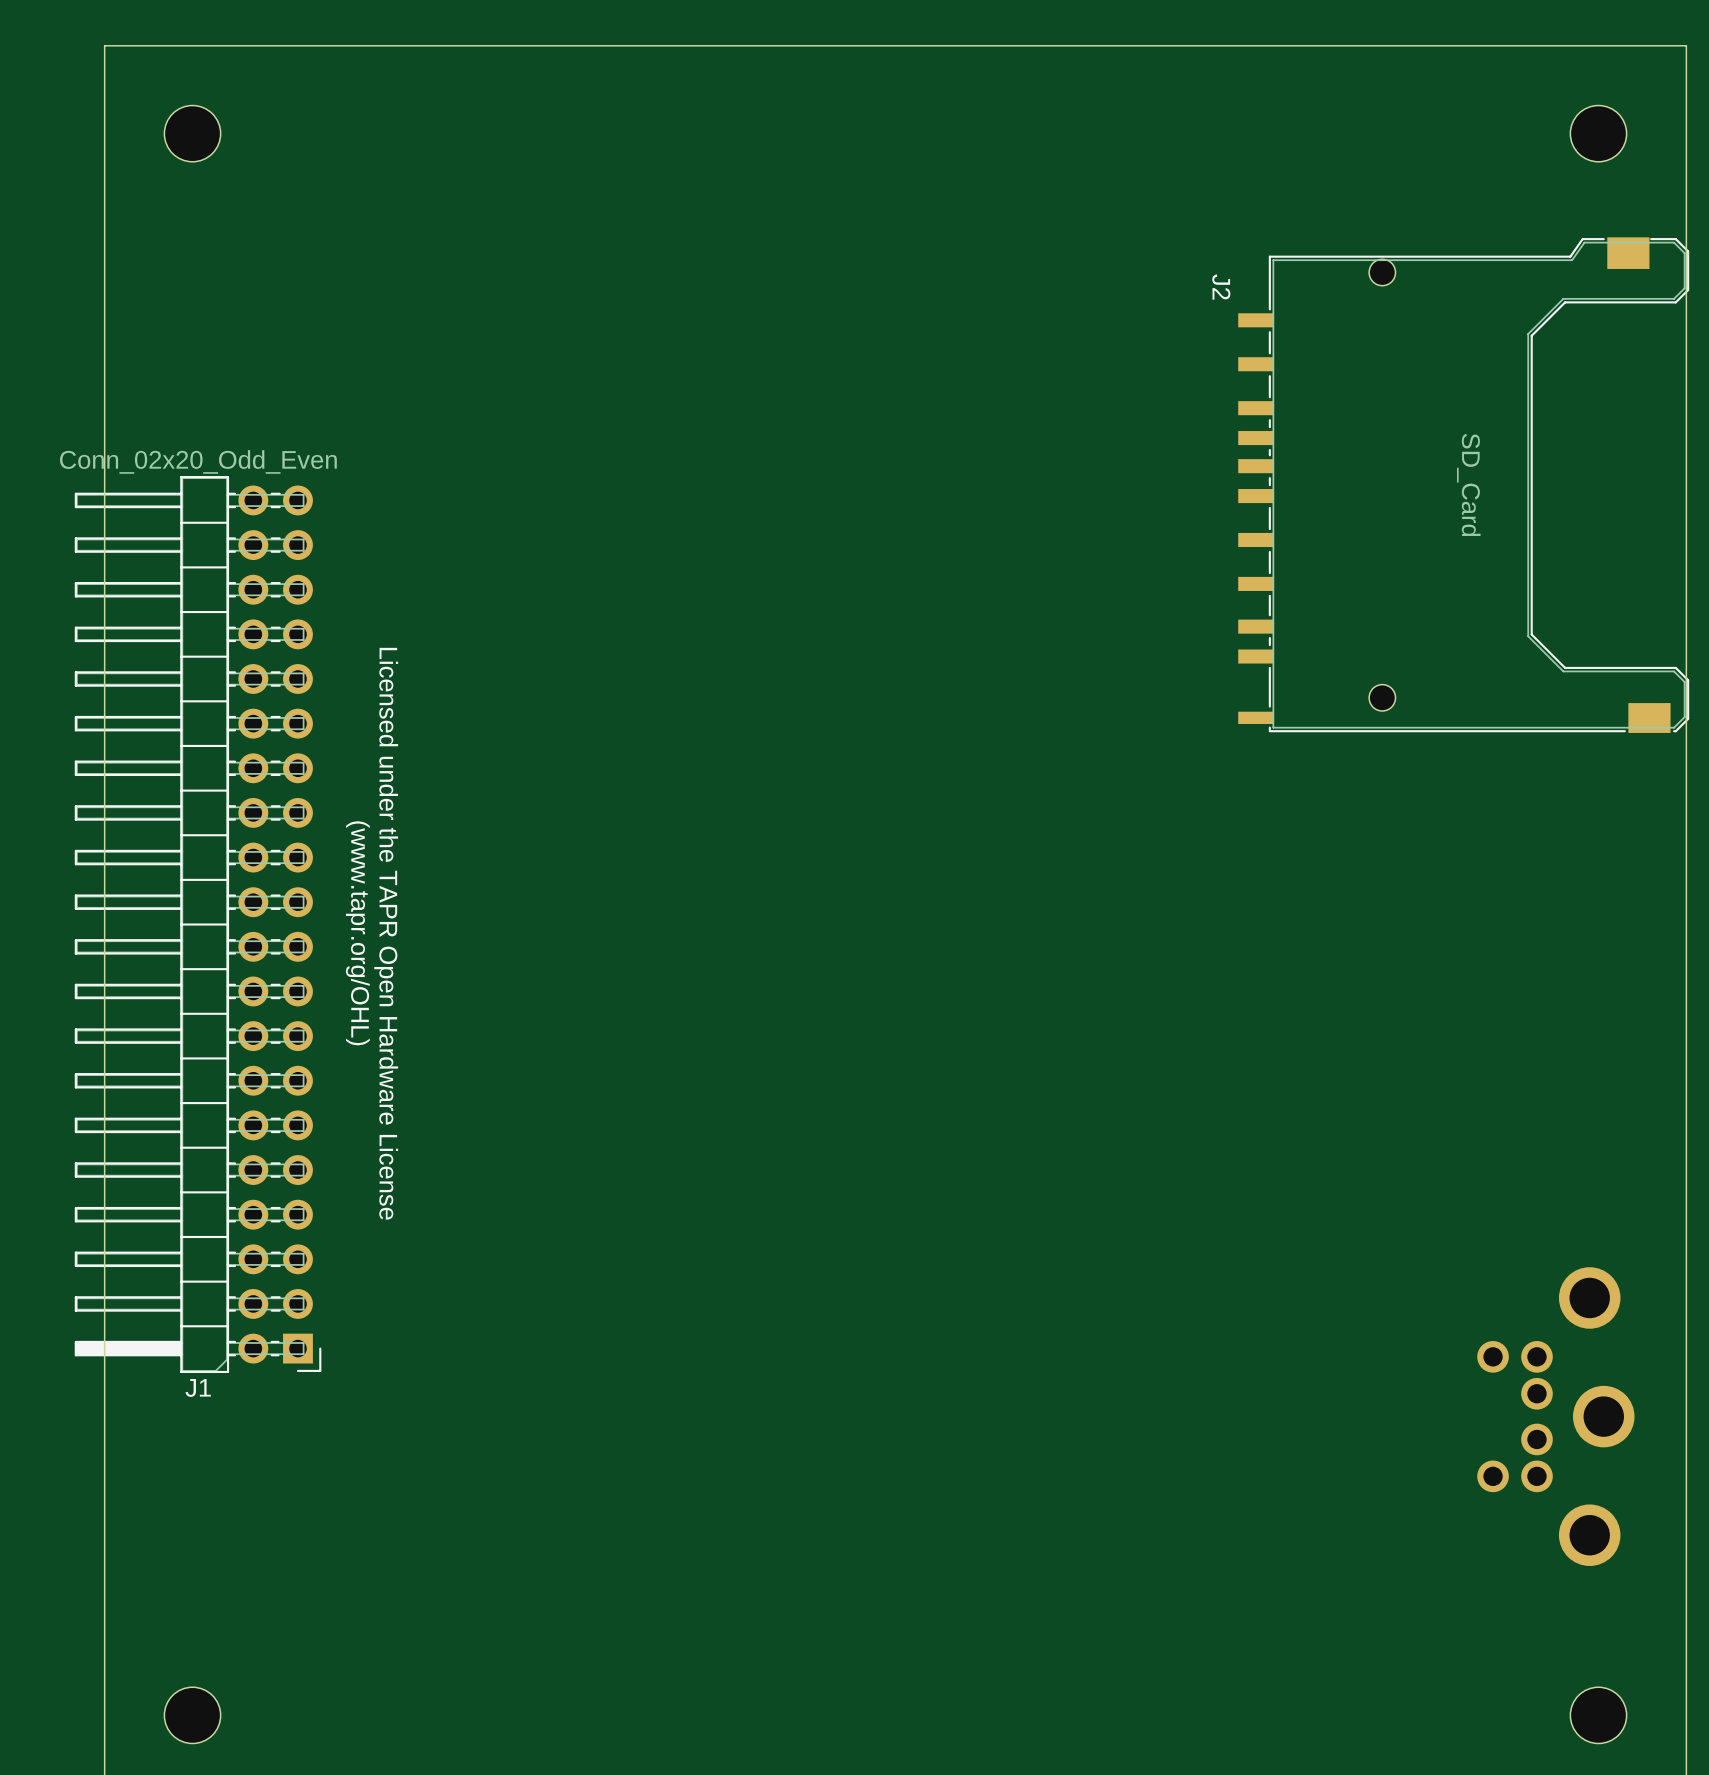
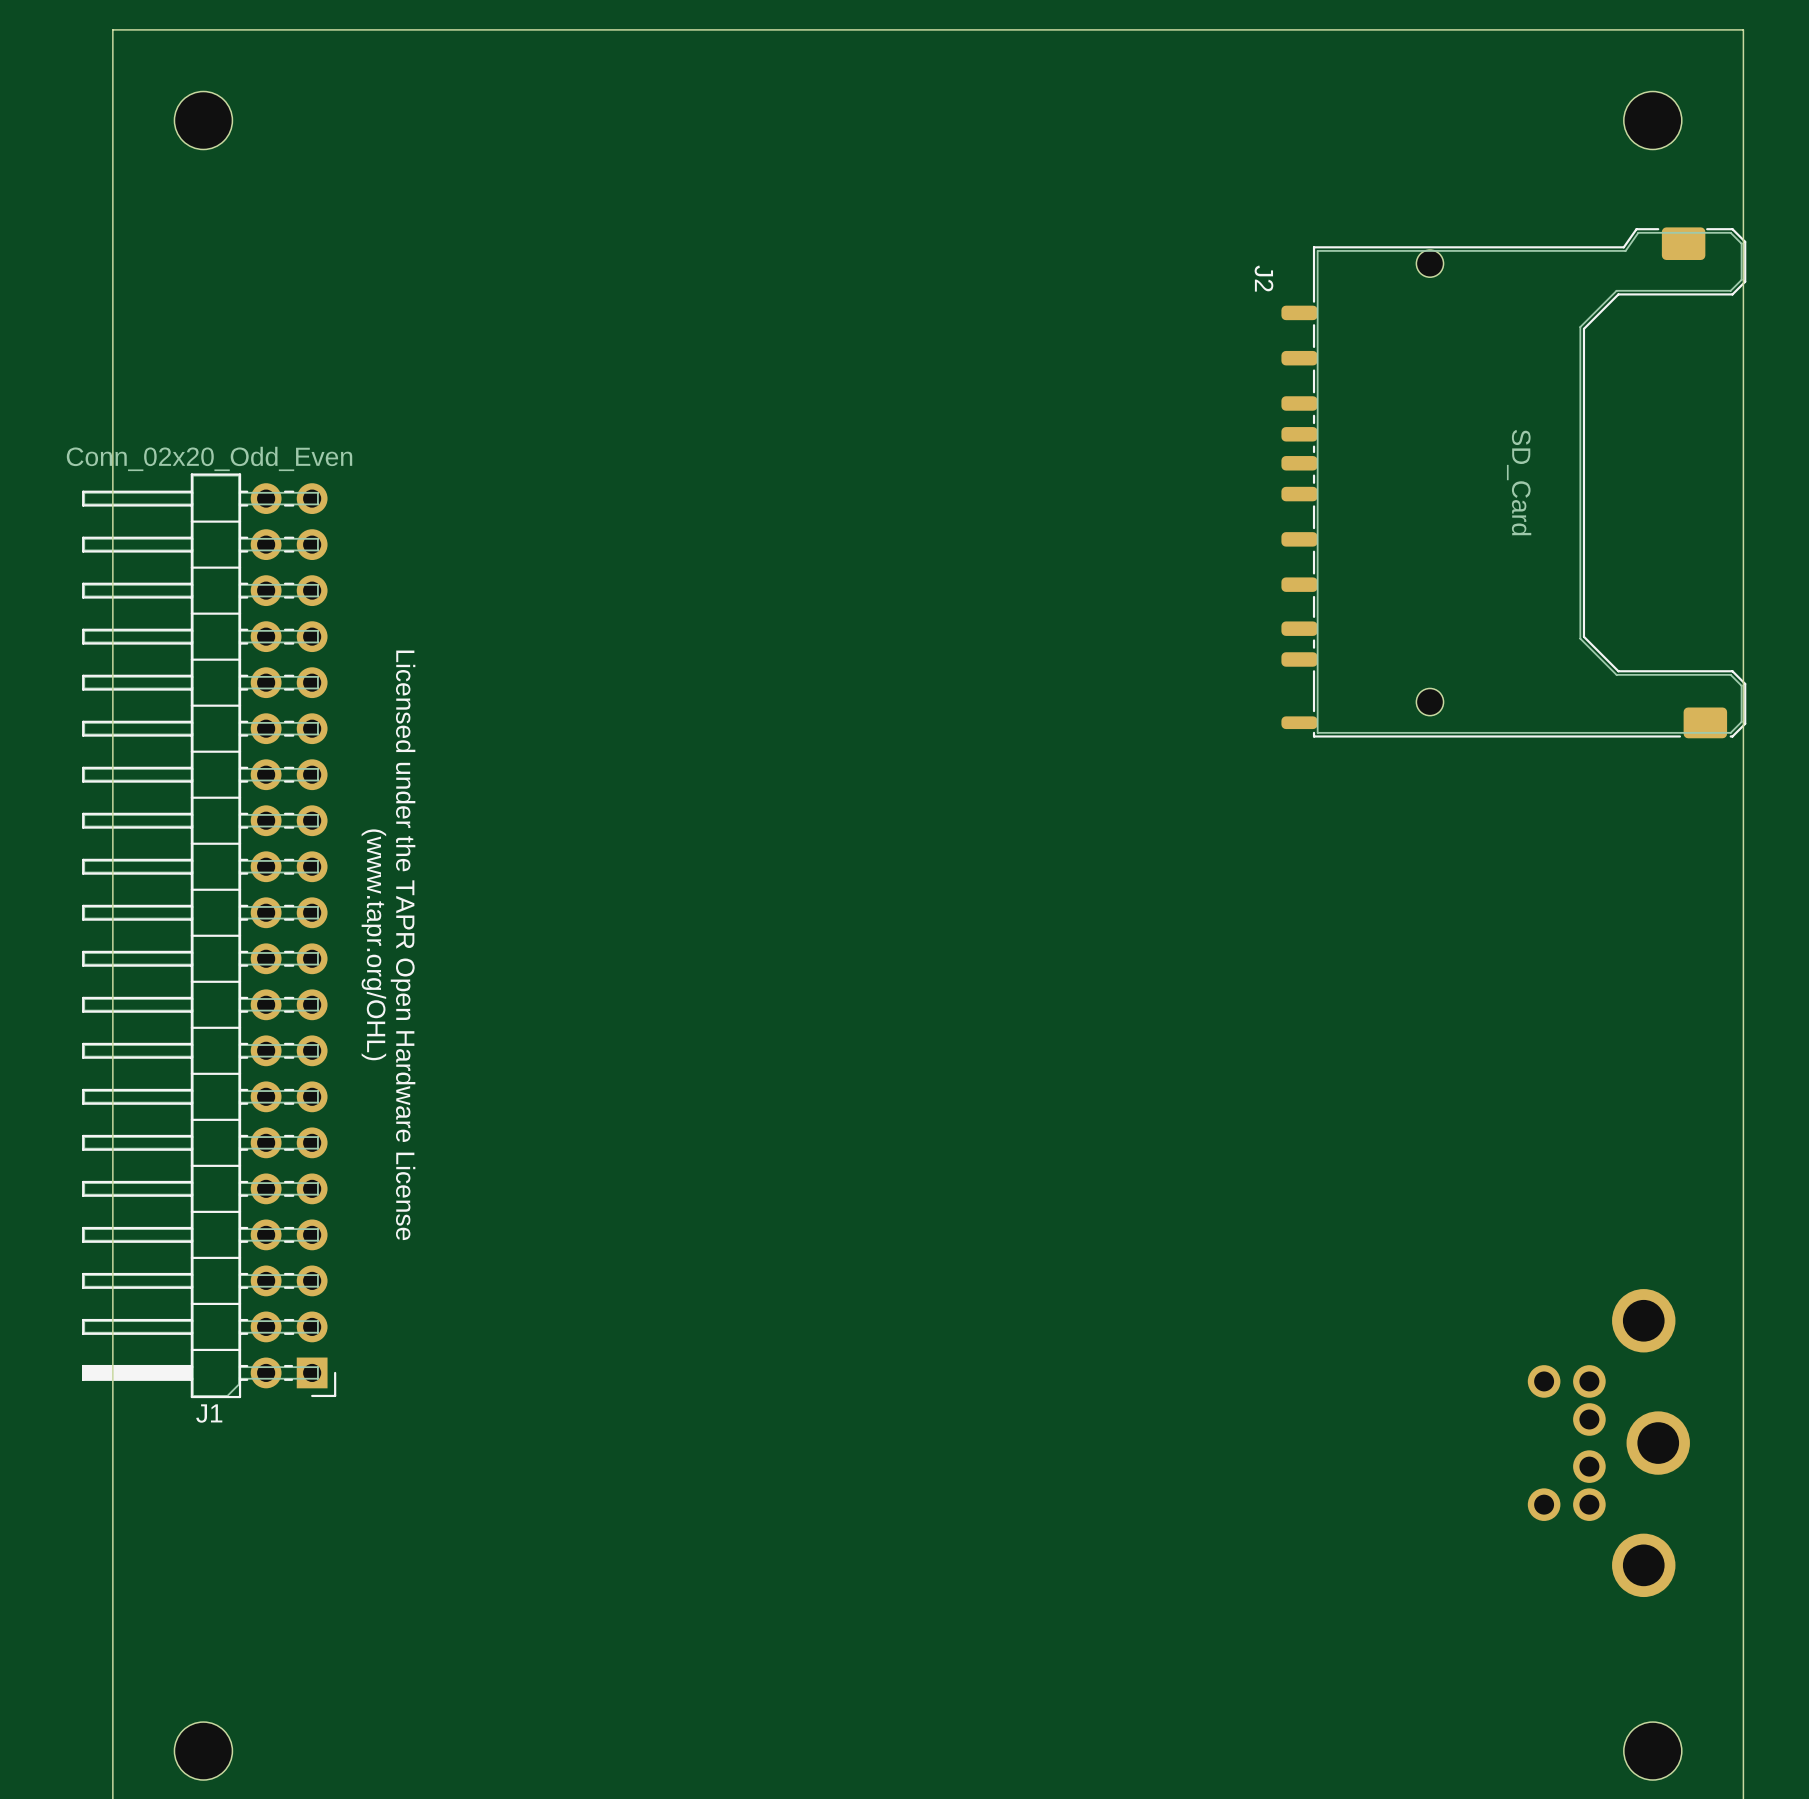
J2 footprint: [1238, 237, 1690, 733] -> [1281, 227, 1747, 739]

